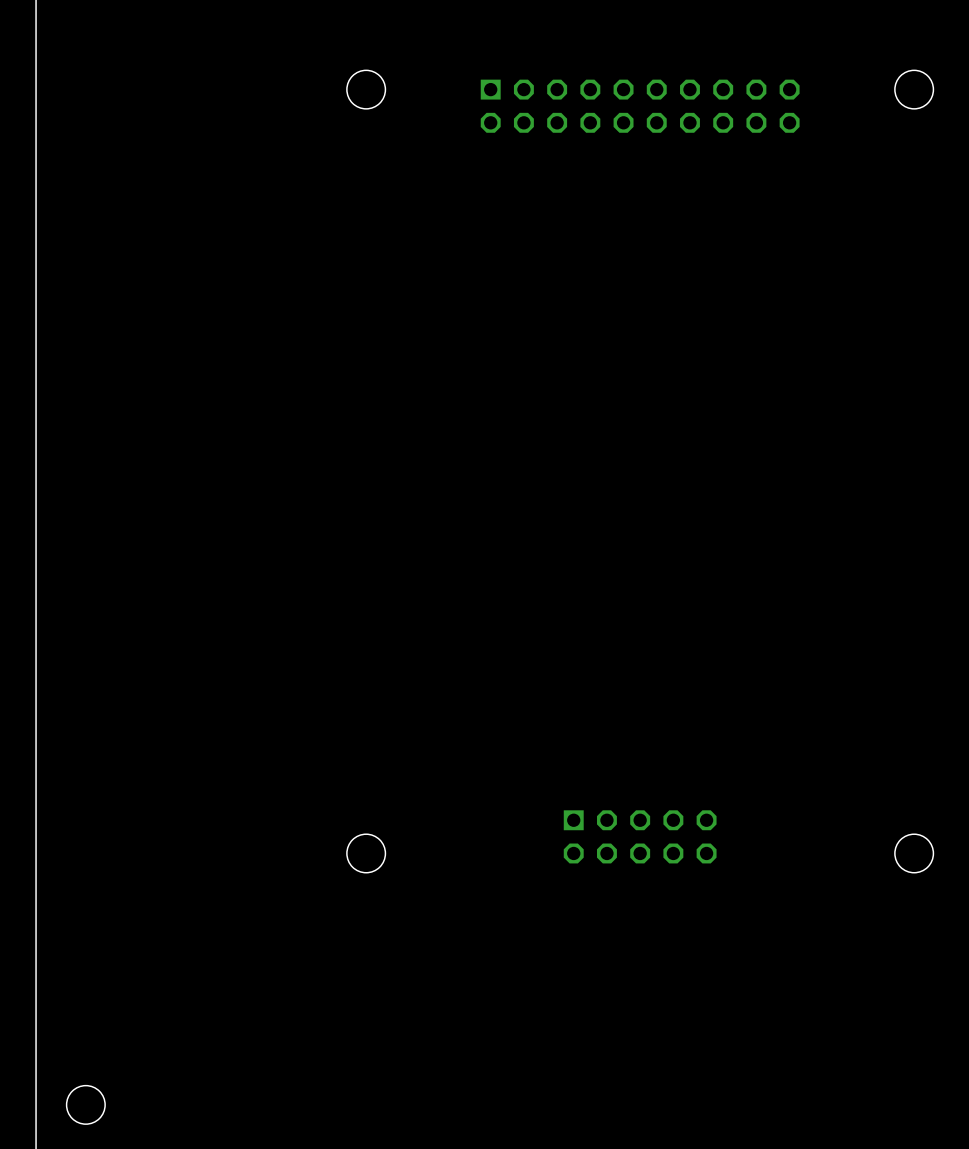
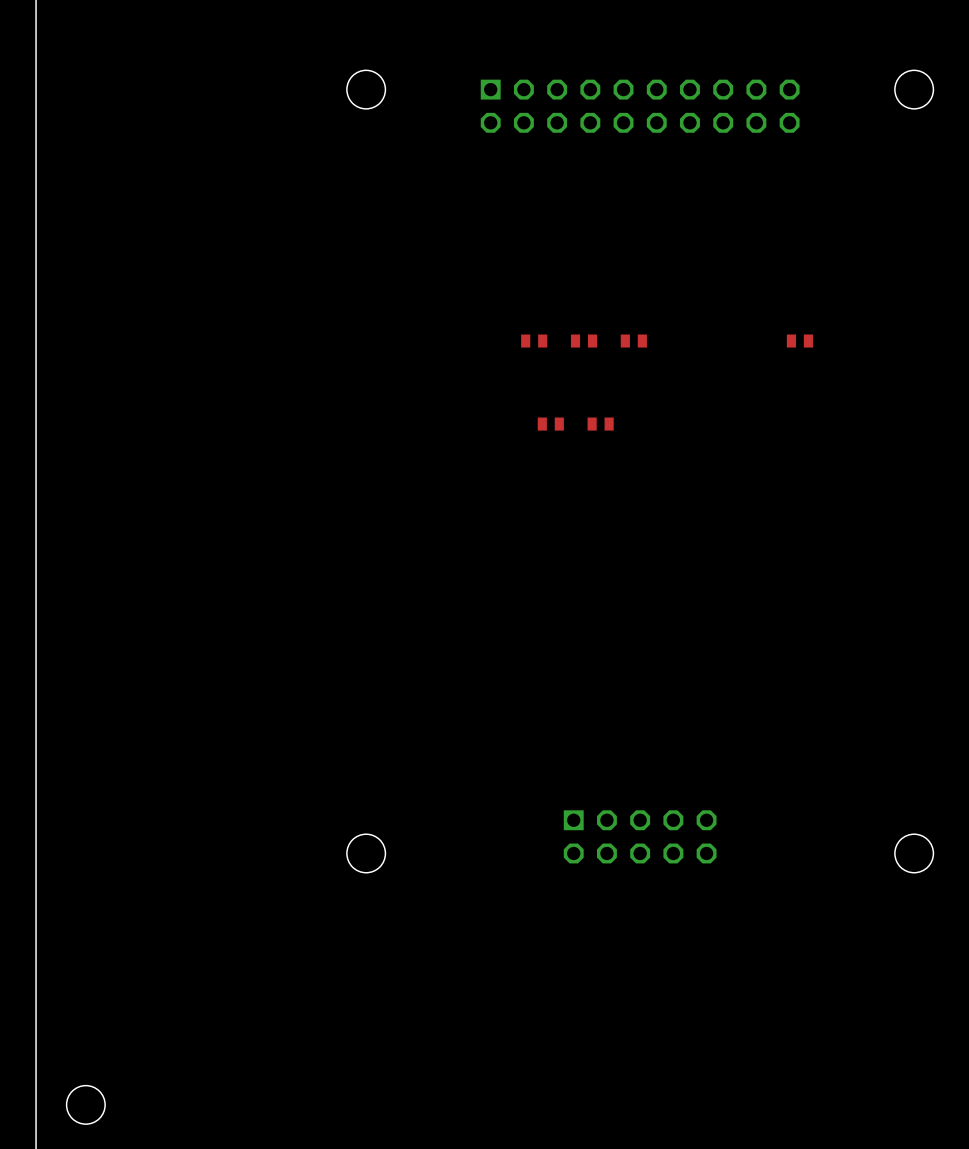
part: none -> (534, 341)
part: none -> (584, 341)
part: none -> (633, 341)
part: none -> (799, 341)
part: none -> (550, 424)
part: none -> (600, 424)

